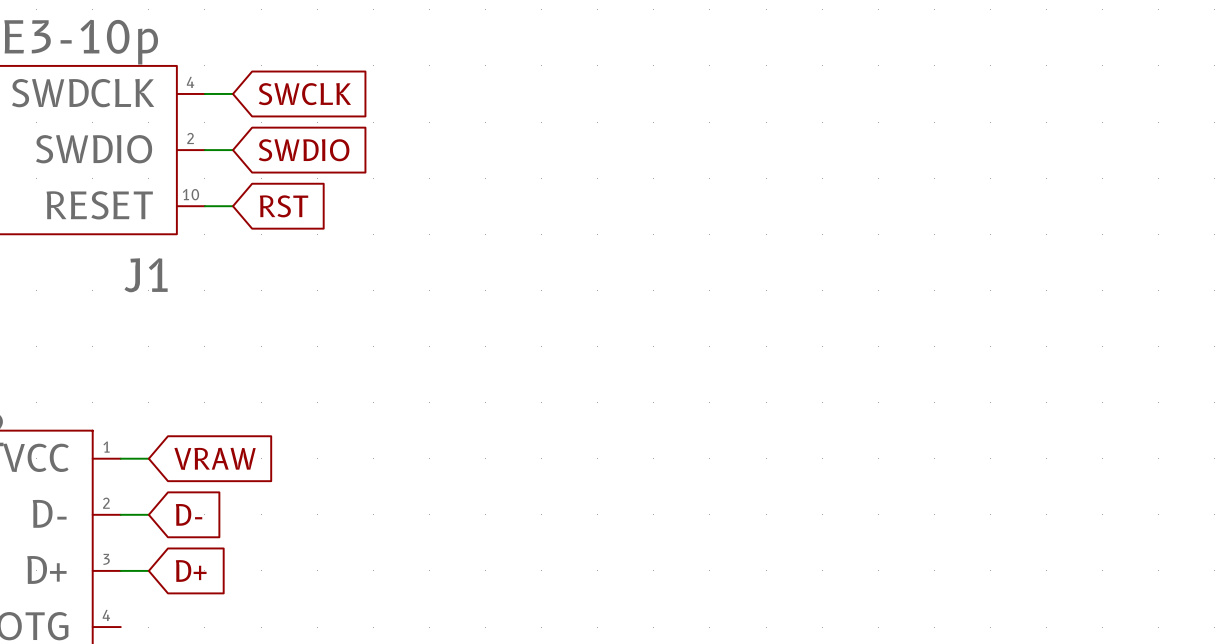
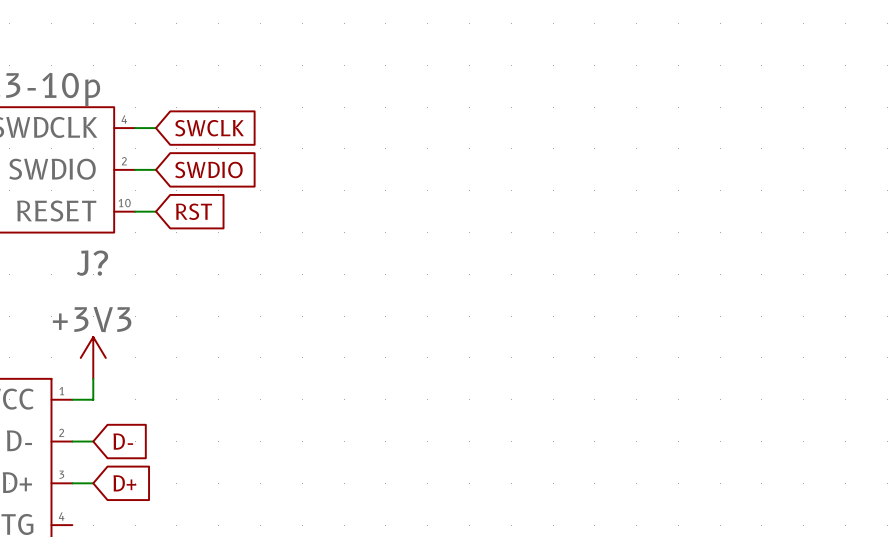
J1 name: J1 (146, 275) -> J? (92, 263)
power symbol: none -> +3V3 (93, 357)
wire: none -> (93, 378) (93, 399)
global label: VRAW (215, 458) -> none

